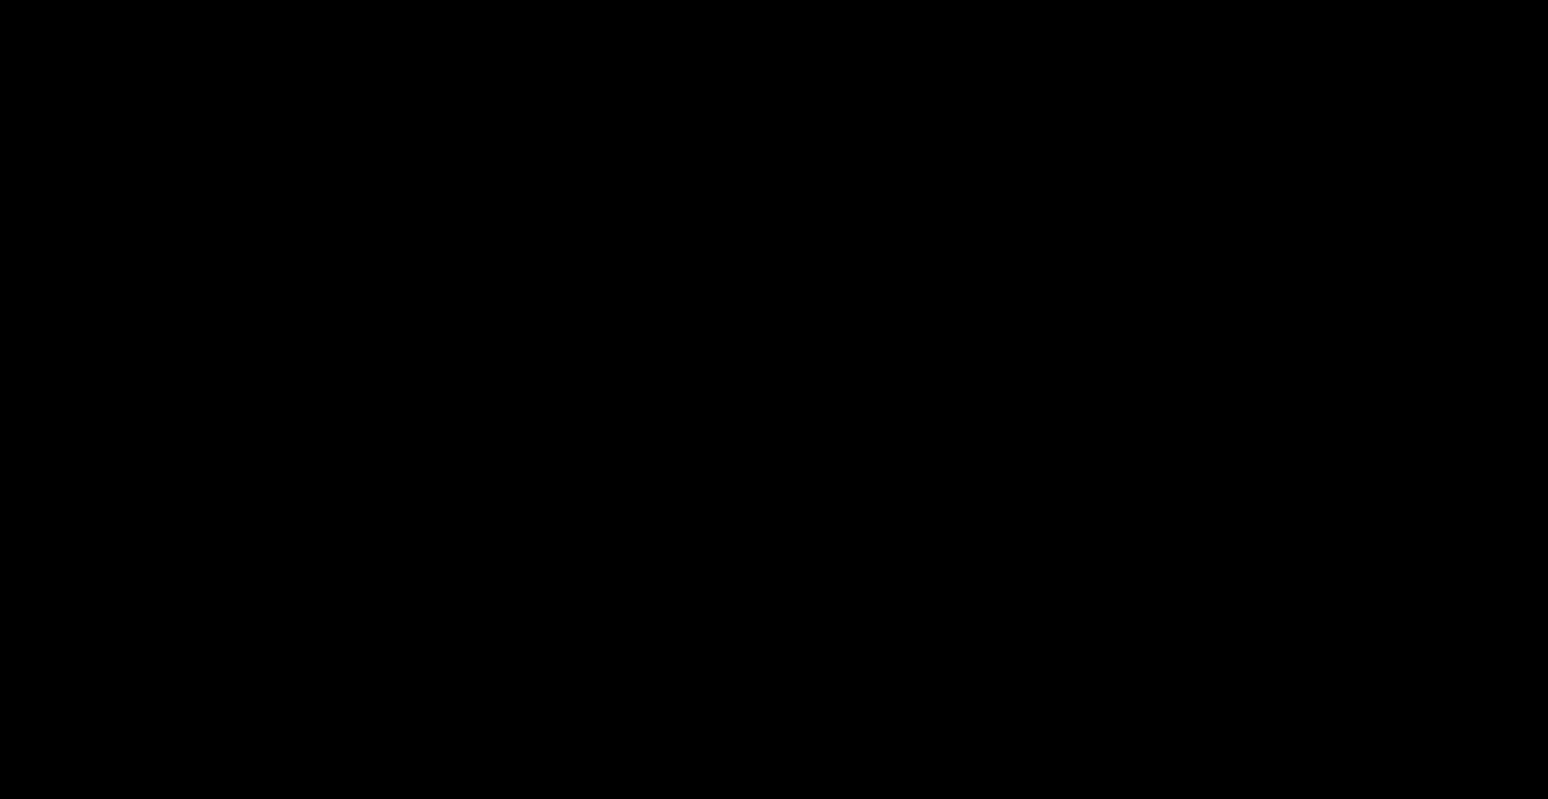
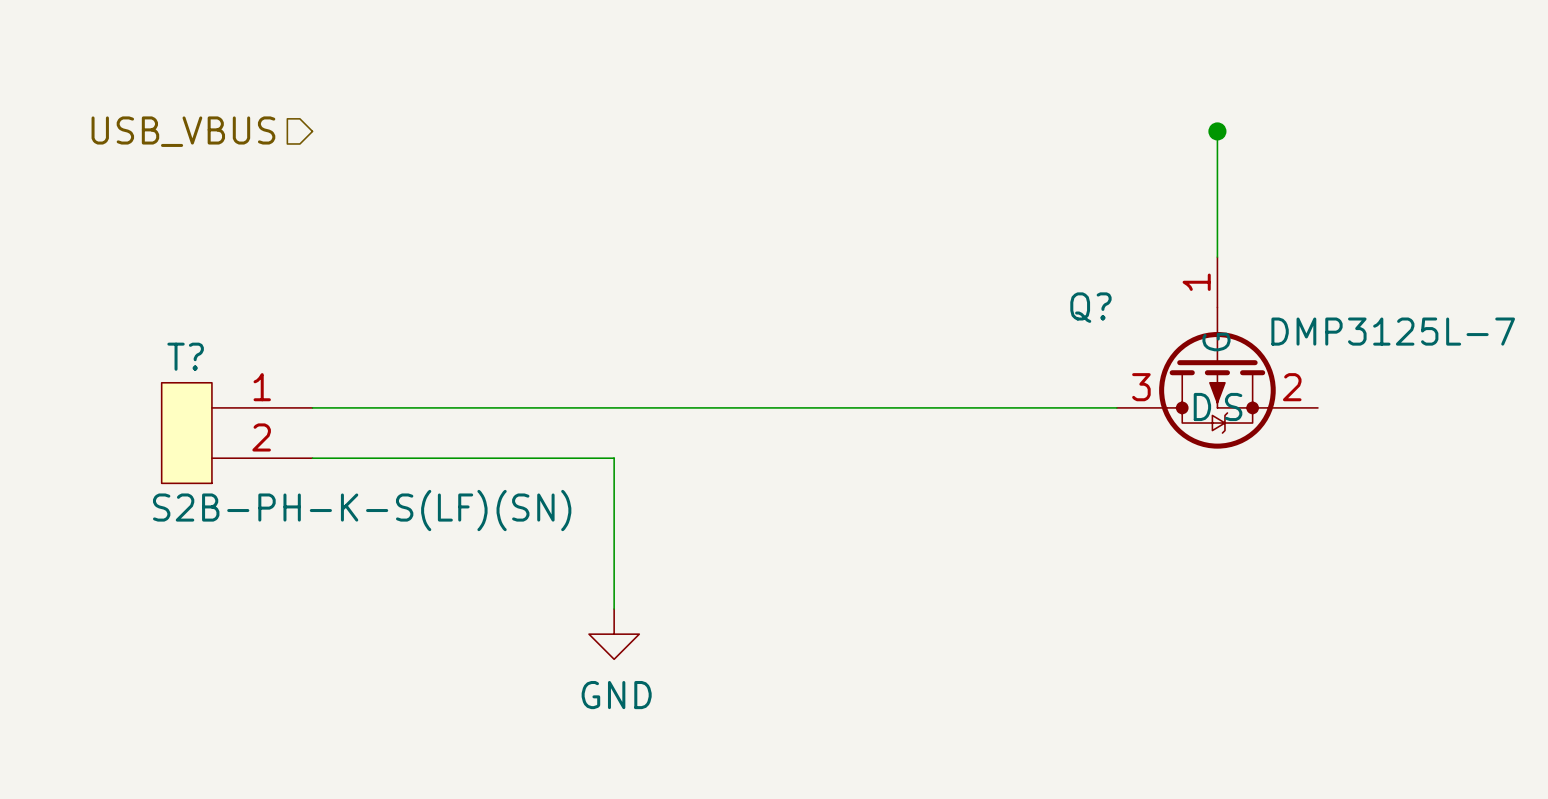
hierarchical label: none -> USB_VBUS (183, 131)
wire: none -> (1217, 131) (1217, 257)
junction: none -> (1217, 131)
Q?: none -> (1217, 352)
wire: none -> (312, 407) (1116, 407)
T?: none -> S2B-PH-K-S(LF)(SN) (237, 433)
wire: none -> (312, 458) (614, 458) (614, 609)
power symbol: none -> GND (614, 634)

